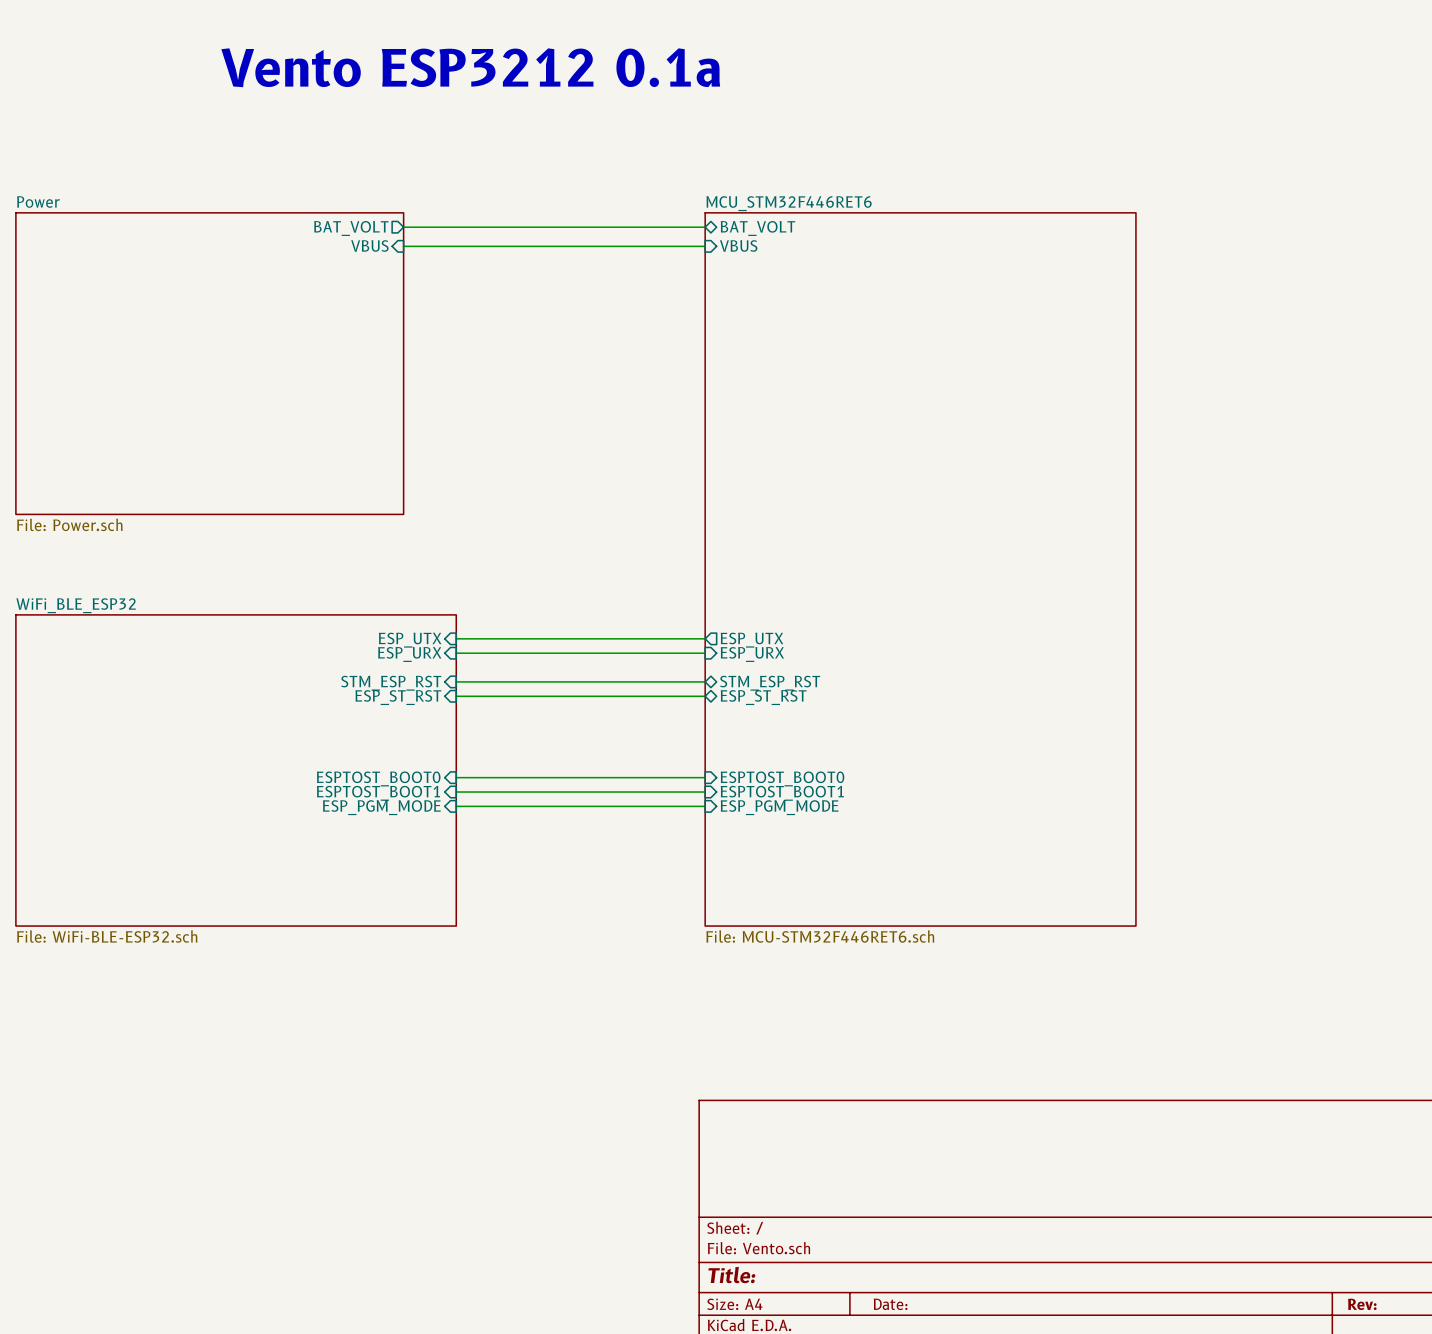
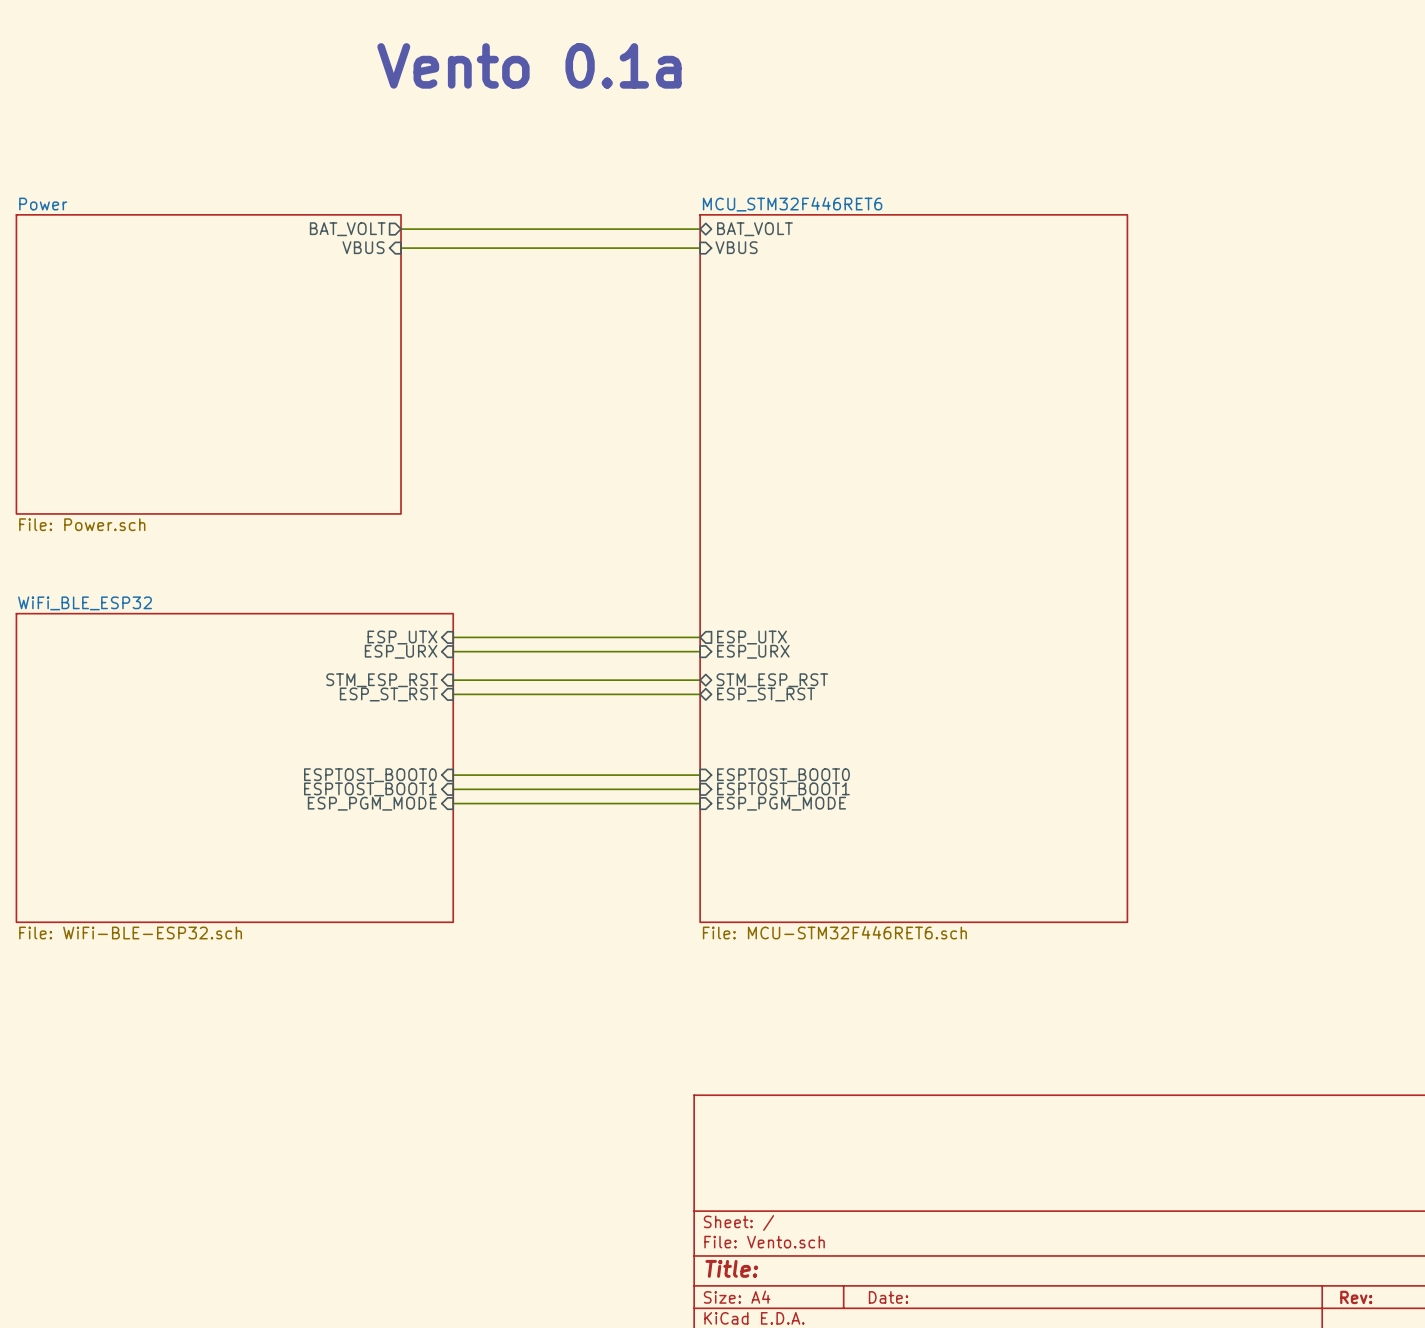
text: Vento ESP3212 0.1a (470, 67) -> Vento 0.1a (529, 65)

